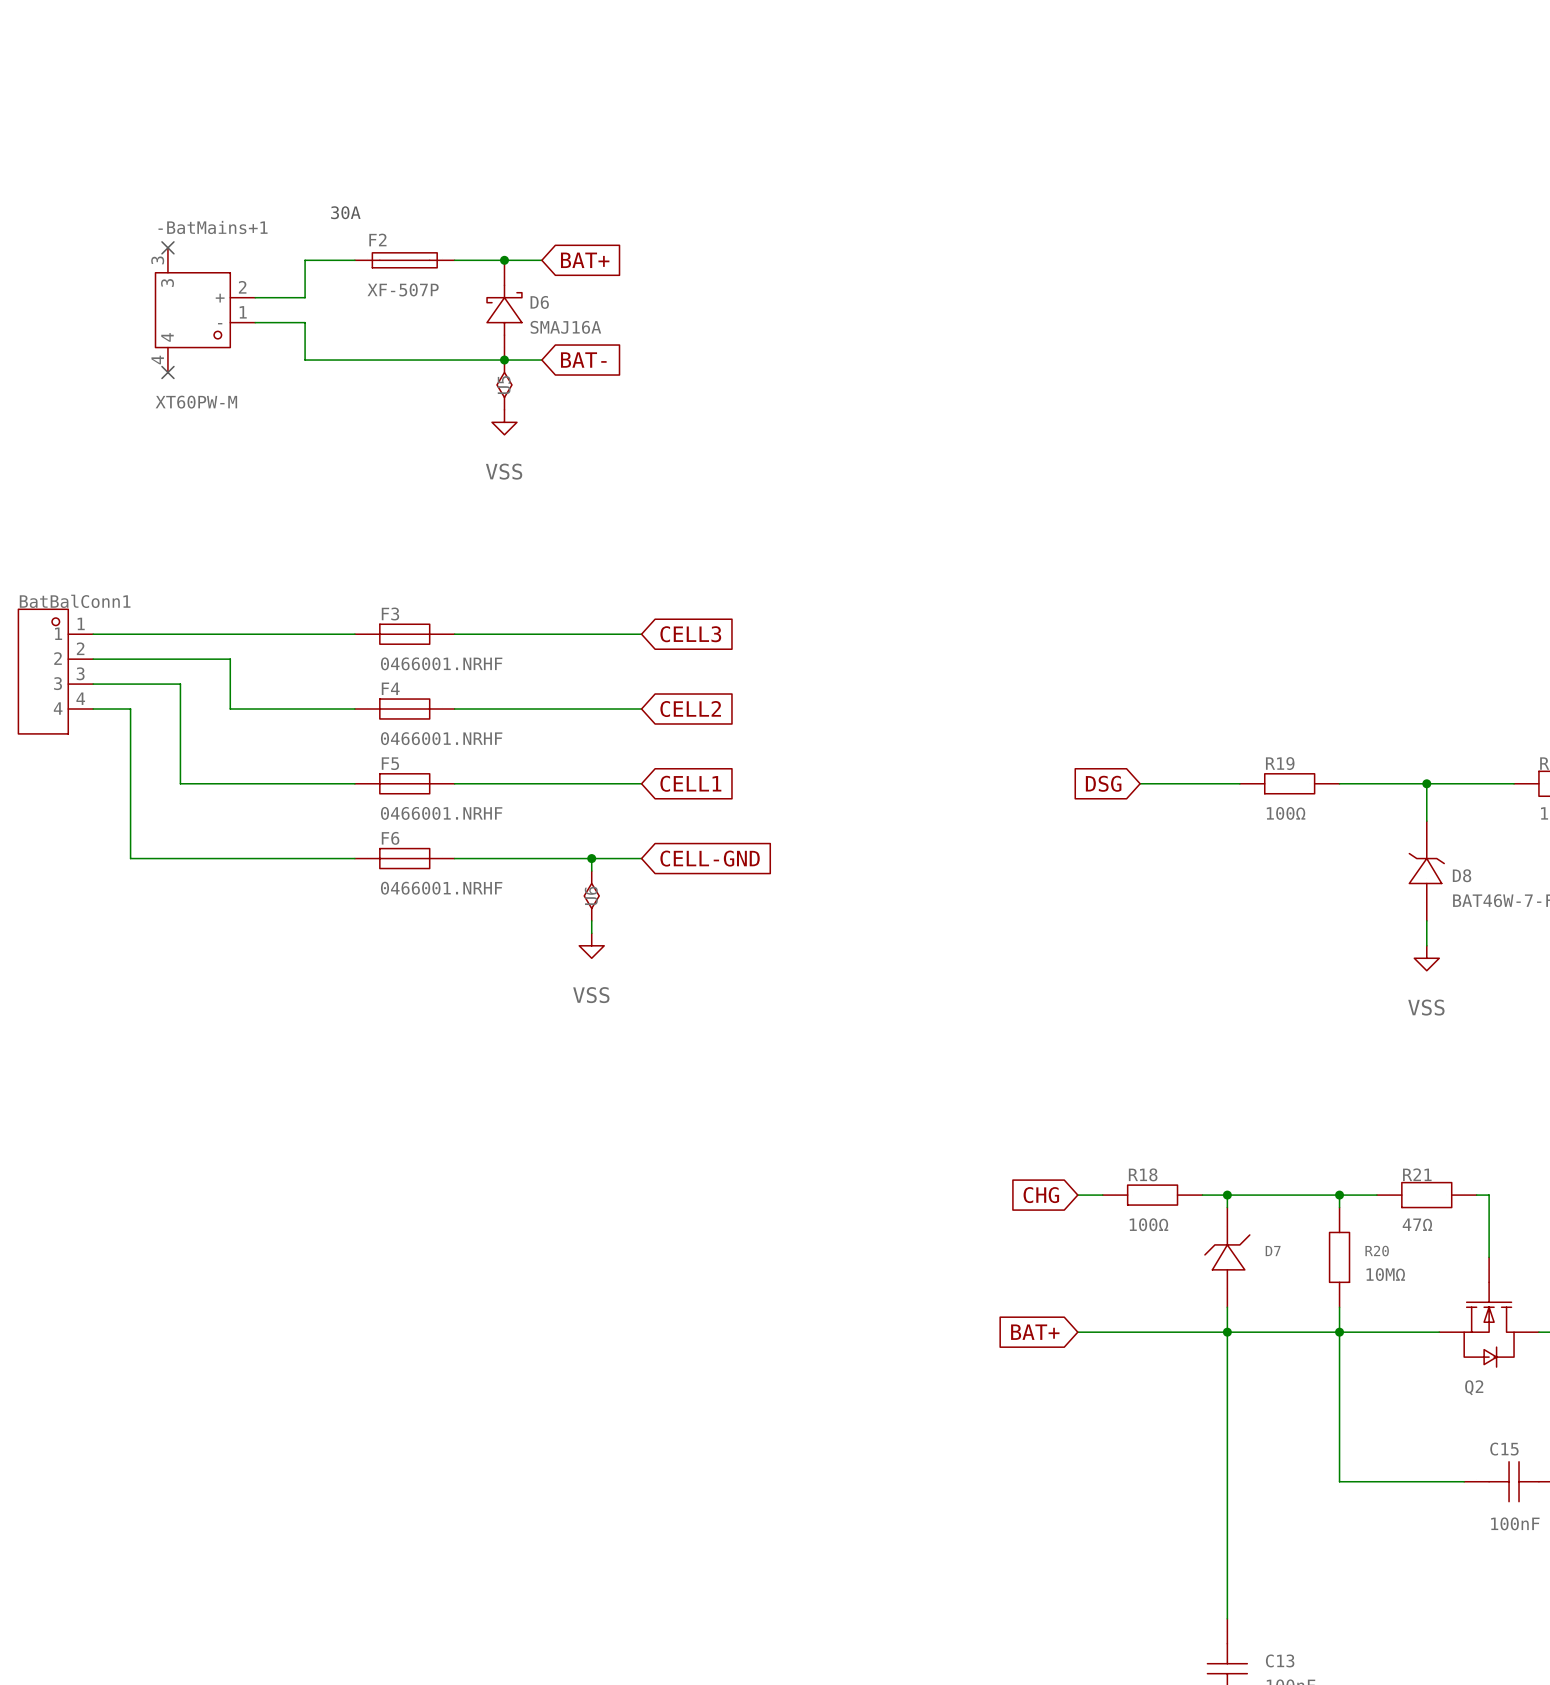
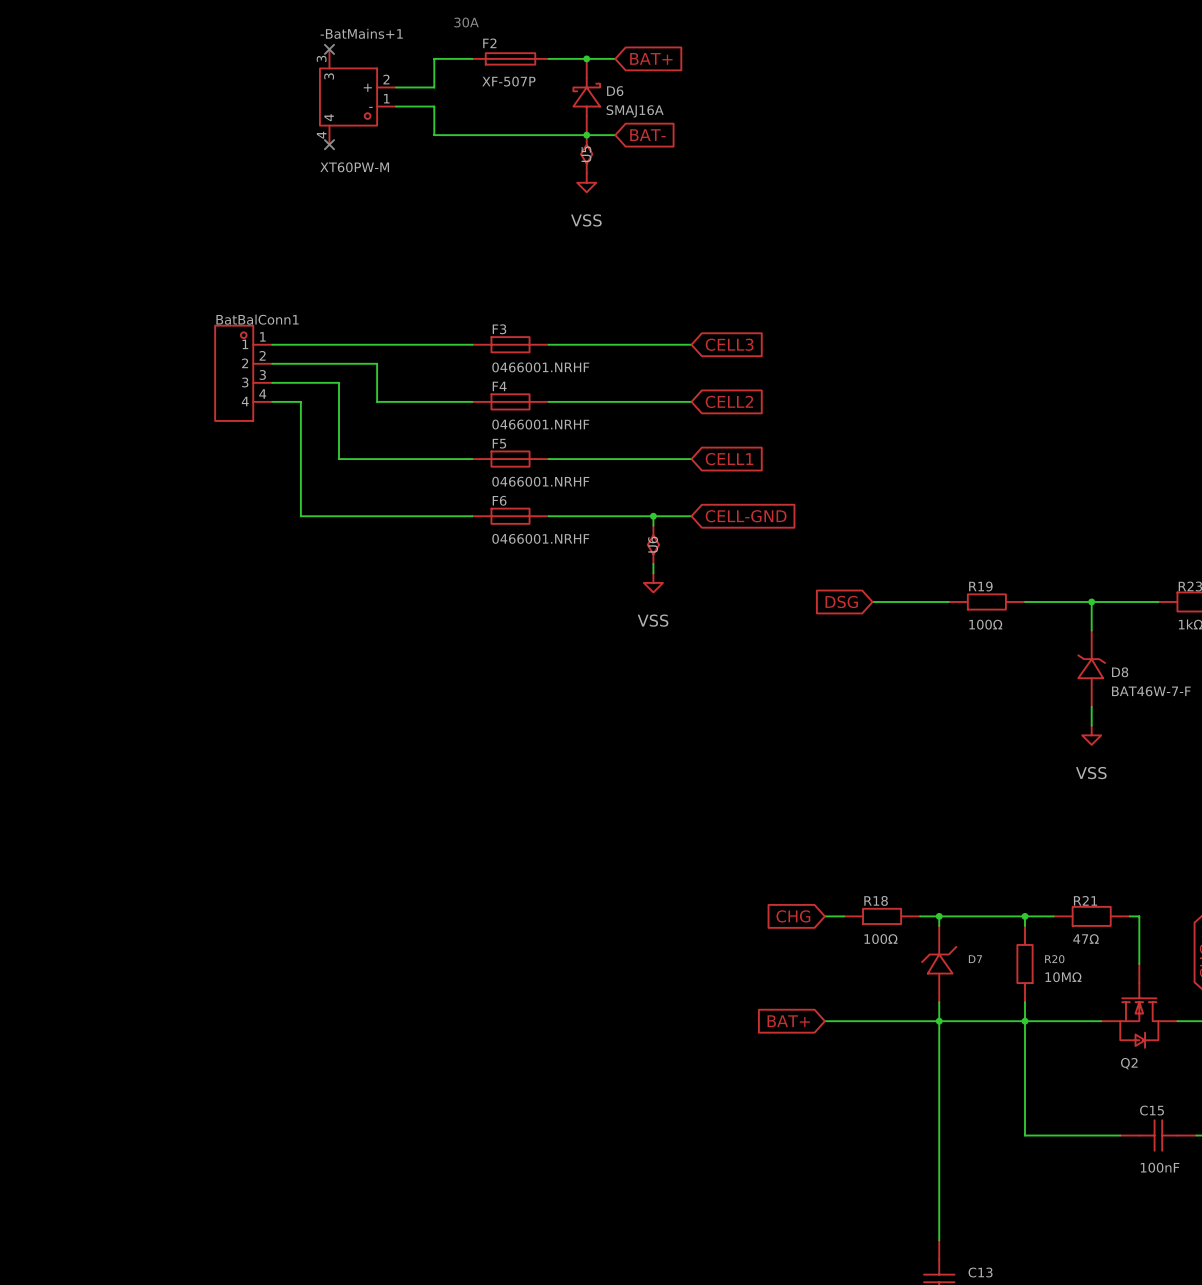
text: none -> 30A (466, 22)
no-connect mark: none -> (329, 49)
wire: none -> (472, 58) (434, 58) (434, 87) (396, 87)
wire: none -> (548, 58) (615, 58)
junction: none -> (586, 58)
global label: none -> BAT+ (651, 58)
wire: none -> (396, 106) (434, 106) (434, 135) (615, 135)
junction: none -> (586, 135)
global label: none -> BAT- (647, 135)
no-connect mark: none -> (329, 144)
text: 30A (345, 212) -> none
power symbol: none -> VSS (586, 182)
no-connect mark: (167, 247) -> none
wire: (354, 260) (305, 260) (305, 297) (255, 297) -> none
F2 position: (404, 260) -> (510, 58)
wire: (454, 260) (541, 260) -> none
junction: (504, 260) -> none
global label: BAT+ (585, 260) -> none
-BatMains+1 position: (205, 310) -> (358, 97)
D6 position: (504, 310) -> (586, 97)
wire: (255, 322) (305, 322) (305, 360) (541, 360) -> none
junction: (504, 360) -> none
global label: BAT- (583, 360) -> none
no-connect mark: (167, 372) -> none
U5 position: (504, 384) -> (586, 154)
power symbol: VSS (504, 422) -> none
wire: none -> (272, 344) (472, 344)
wire: none -> (548, 344) (691, 344)
global label: none -> CELL3 (729, 344)
wire: none -> (272, 363) (377, 363) (377, 401) (472, 401)
wire: none -> (272, 382) (339, 382) (339, 459) (472, 459)
wire: none -> (272, 401) (300, 401) (300, 516) (472, 516)
wire: none -> (548, 401) (691, 401)
global label: none -> CELL2 (729, 401)
wire: none -> (548, 459) (691, 459)
global label: none -> CELL1 (729, 459)
wire: (93, 634) (354, 634) -> none
F3 position: (404, 634) -> (510, 344)
wire: (454, 634) (641, 634) -> none
global label: CELL3 (690, 634) -> none
wire: (93, 659) (230, 659) (230, 709) (354, 709) -> none
BatBalConn1 position: (55, 671) -> (243, 373)
wire: none -> (548, 516) (691, 516)
wire: none -> (653, 516) (653, 525)
junction: none -> (653, 516)
global label: none -> CELL-GND (746, 516)
wire: (93, 684) (180, 684) (180, 783) (354, 783) -> none
wire: (93, 709) (130, 709) (130, 858) (354, 858) -> none
F4 position: (404, 709) -> (510, 401)
wire: (454, 709) (641, 709) -> none
global label: CELL2 (690, 709) -> none
wire: none -> (653, 563) (653, 573)
power symbol: none -> VSS (653, 582)
F5 position: (404, 783) -> (510, 459)
wire: (454, 783) (641, 783) -> none
global label: CELL1 (690, 783) -> none
F6 position: (404, 858) -> (510, 516)
wire: (454, 858) (641, 858) -> none
wire: (591, 858) (591, 871) -> none
junction: (591, 858) -> none
global label: CELL-GND (710, 858) -> none
U6 position: (591, 895) -> (653, 544)
wire: (591, 920) (591, 933) -> none
power symbol: VSS (591, 945) -> none

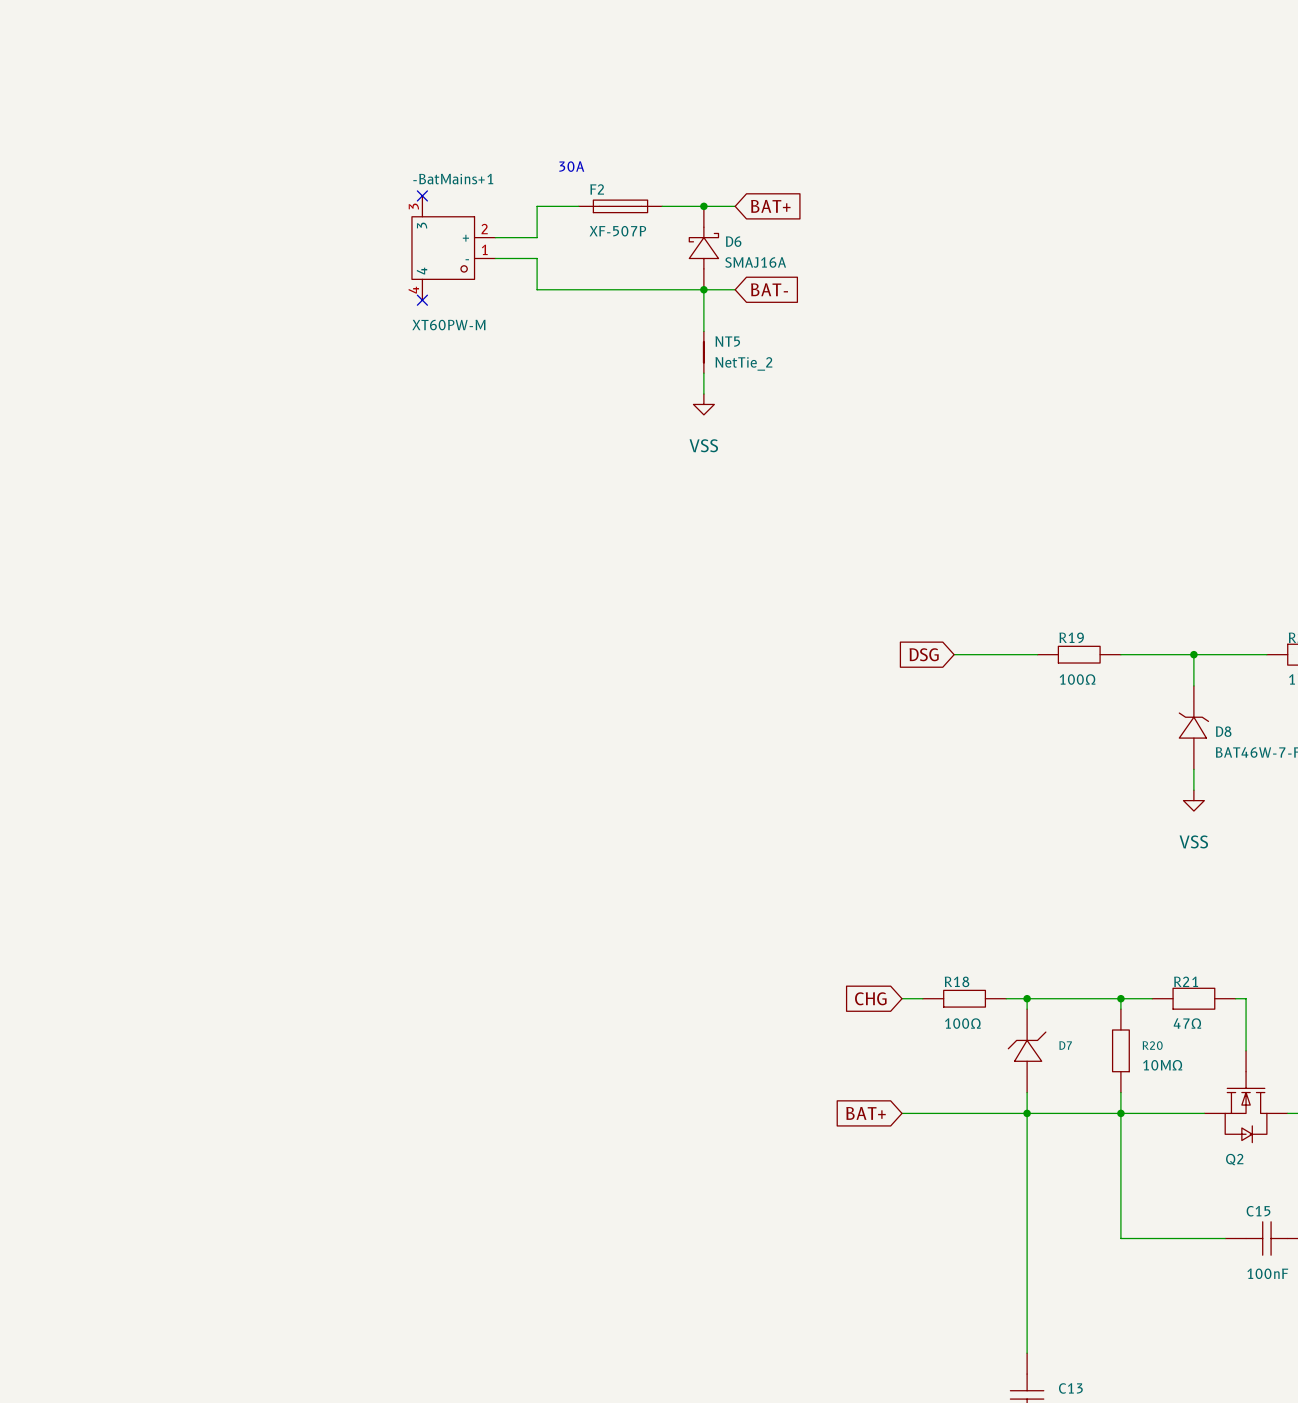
text position: 30A (466, 22) -> 30A (571, 166)
no-connect mark: (329, 49) -> none
wire: (472, 58) (434, 58) (434, 87) (396, 87) -> (578, 206) (537, 206) (537, 237) (495, 237)
F2 position: (510, 58) -> (620, 206)
wire: (548, 58) (615, 58) -> (662, 206) (735, 206)
junction: (586, 58) -> none
global label position: BAT+ (651, 58) -> BAT+ (770, 206)
-BatMains+1 position: (358, 97) -> (453, 248)
D6 position: (586, 97) -> (703, 248)
wire: (396, 106) (434, 106) (434, 135) (615, 135) -> (495, 258) (537, 258) (537, 289) (735, 289)
junction: (586, 135) -> none
global label position: BAT- (647, 135) -> BAT- (769, 289)
no-connect mark: (329, 144) -> none
U5: (586, 154) -> none
no-connect mark: none -> (422, 195)
power symbol: VSS (586, 182) -> none
junction: none -> (703, 206)
wire: none -> (703, 289) (703, 331)
junction: none -> (703, 289)
no-connect mark: none -> (422, 300)
NT5: none -> NetTie_2 (703, 352)
wire: (272, 344) (472, 344) -> none
F3: 0466001.NRHF (510, 344) -> none
wire: (548, 344) (691, 344) -> none
wire: none -> (703, 373) (703, 394)
global label: CELL3 (729, 344) -> none
wire: (272, 363) (377, 363) (377, 401) (472, 401) -> none
BatBalConn1: (243, 373) -> none
power symbol: none -> VSS (703, 404)
wire: (272, 382) (339, 382) (339, 459) (472, 459) -> none
wire: (272, 401) (300, 401) (300, 516) (472, 516) -> none
F4: 0466001.NRHF (510, 401) -> none
wire: (548, 401) (691, 401) -> none
global label: CELL2 (729, 401) -> none
F5: 0466001.NRHF (510, 459) -> none
wire: (548, 459) (691, 459) -> none
global label: CELL1 (729, 459) -> none
F6: 0466001.NRHF (510, 516) -> none
wire: (548, 516) (691, 516) -> none
wire: (653, 516) (653, 525) -> none
junction: (653, 516) -> none
global label: CELL-GND (746, 516) -> none
U6: (653, 544) -> none
wire: (653, 563) (653, 573) -> none
power symbol: VSS (653, 582) -> none

